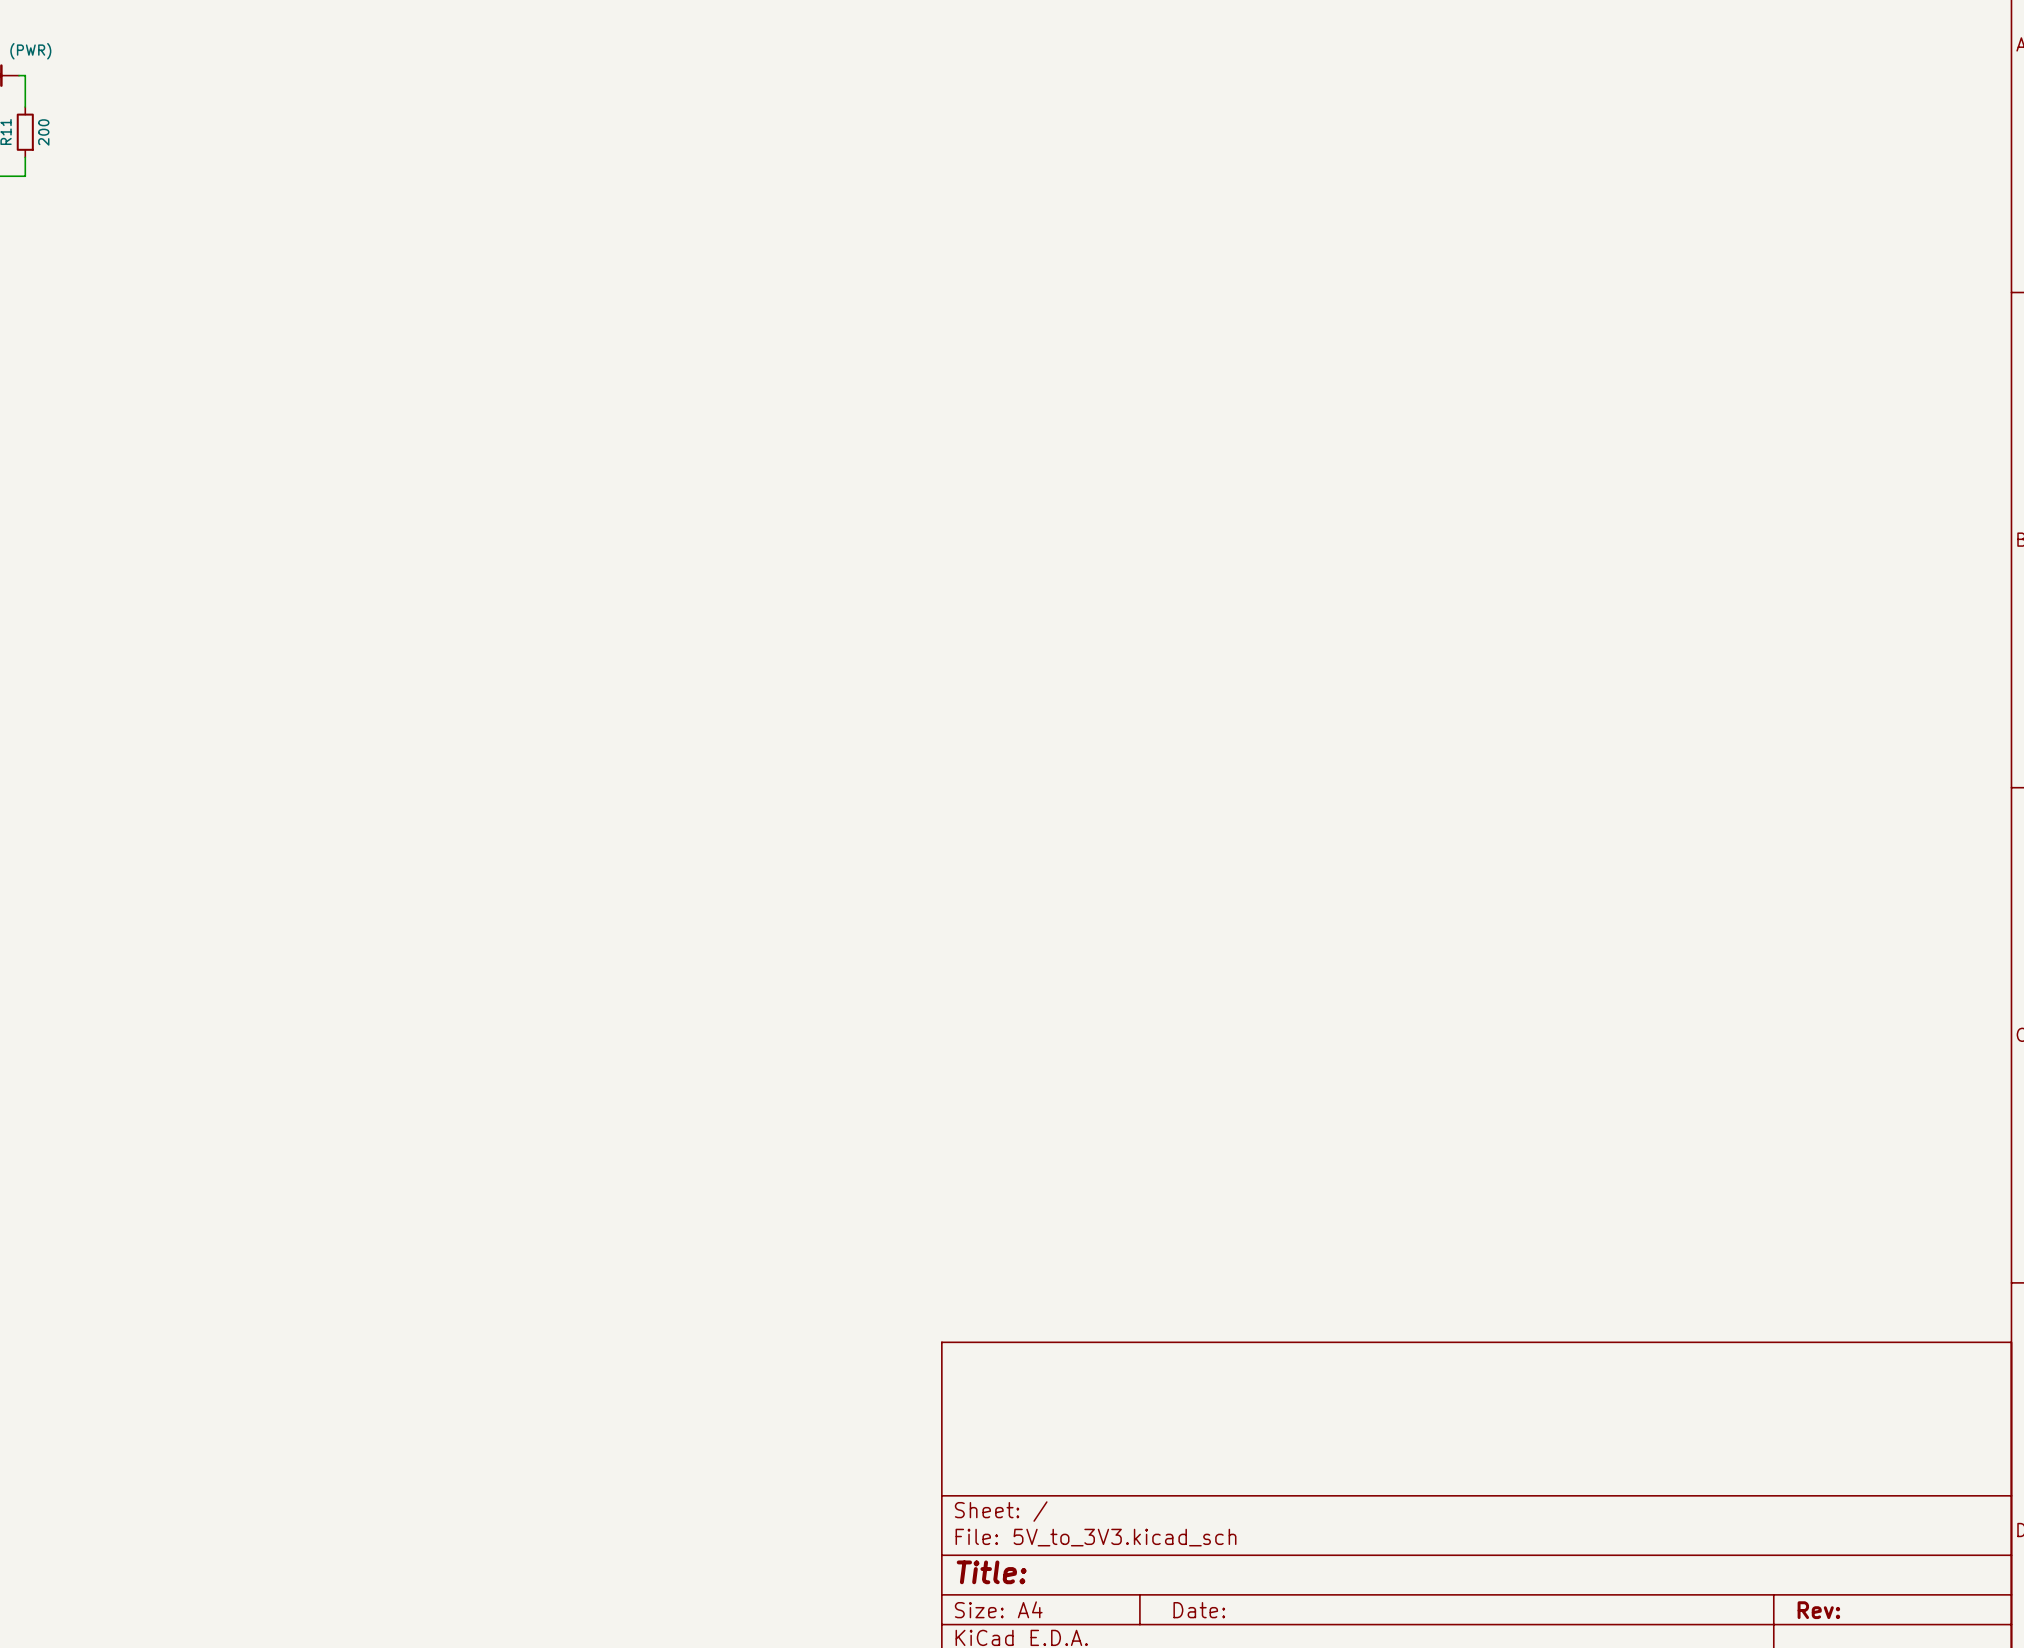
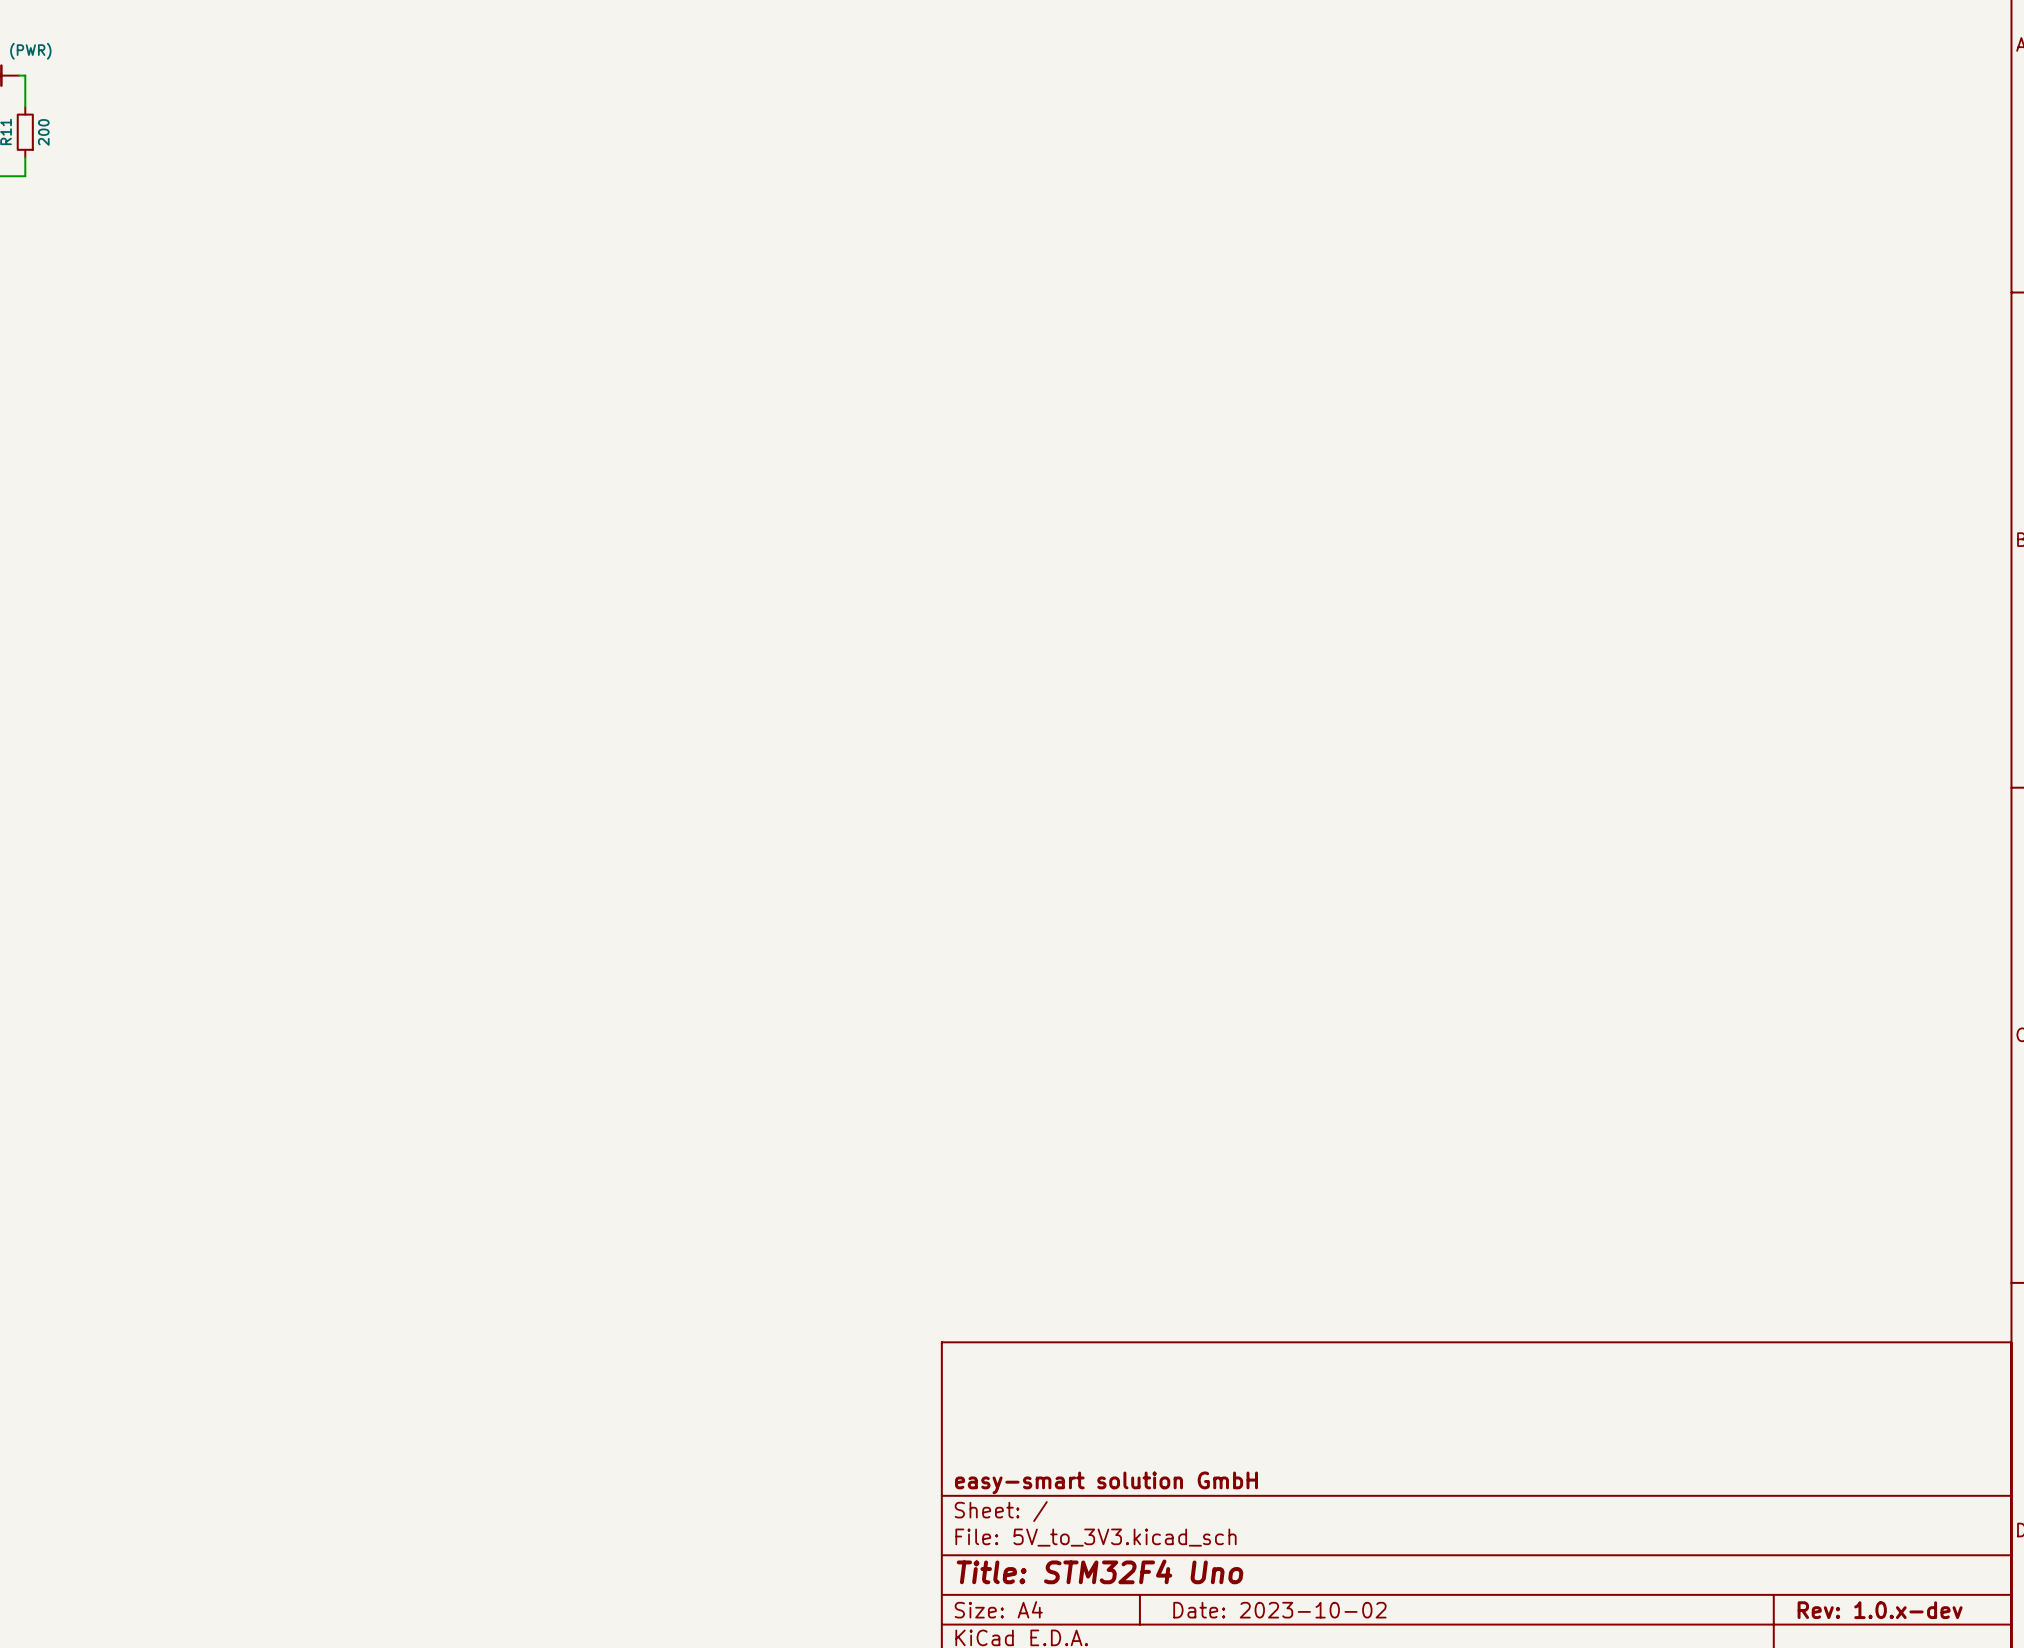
title block: none -> easy-smart solution GmbH (1106, 1482)
title block: Title: (991, 1572) -> Title: STM32F4 Uno (1100, 1571)
title block: Date: (1199, 1610) -> Date: 2023-10-02 (1279, 1610)
title block: Rev: (1818, 1610) -> Rev: 1.0.x-dev (1880, 1610)

